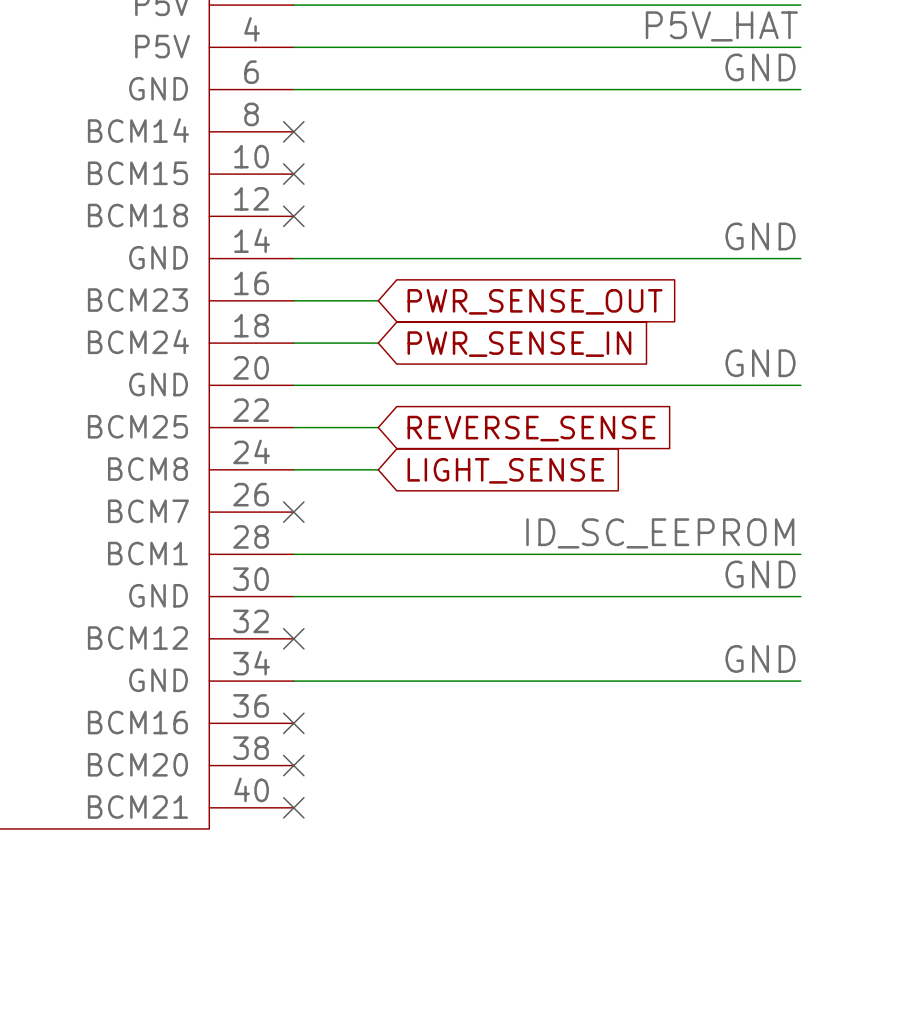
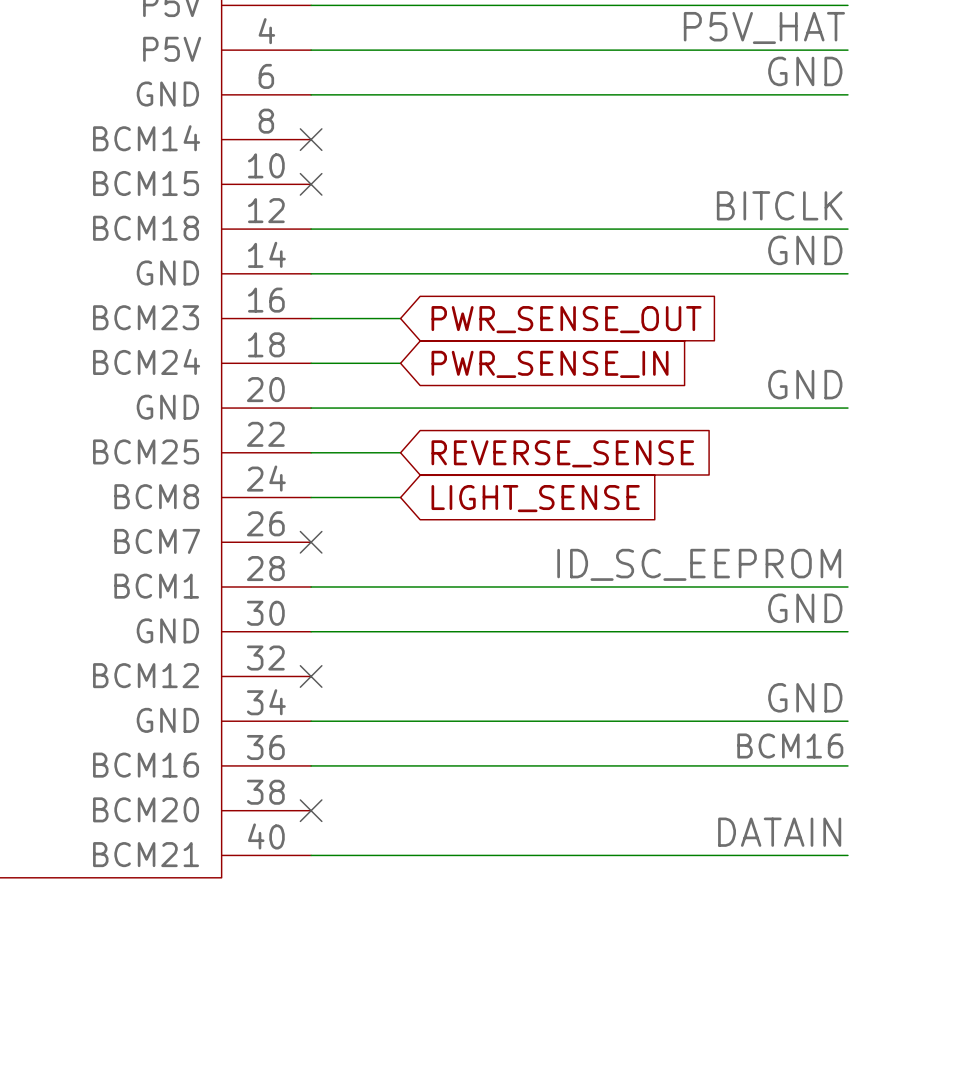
label: none -> BITCLK (779, 205)
wire: none -> (311, 229) (847, 229)
no-connect mark: (293, 216) -> none
label: none -> BCM16 (790, 745)
wire: none -> (311, 765) (847, 765)
no-connect mark: (293, 723) -> none
label: none -> DATAIN (779, 832)
wire: none -> (311, 855) (847, 855)
no-connect mark: (293, 807) -> none

